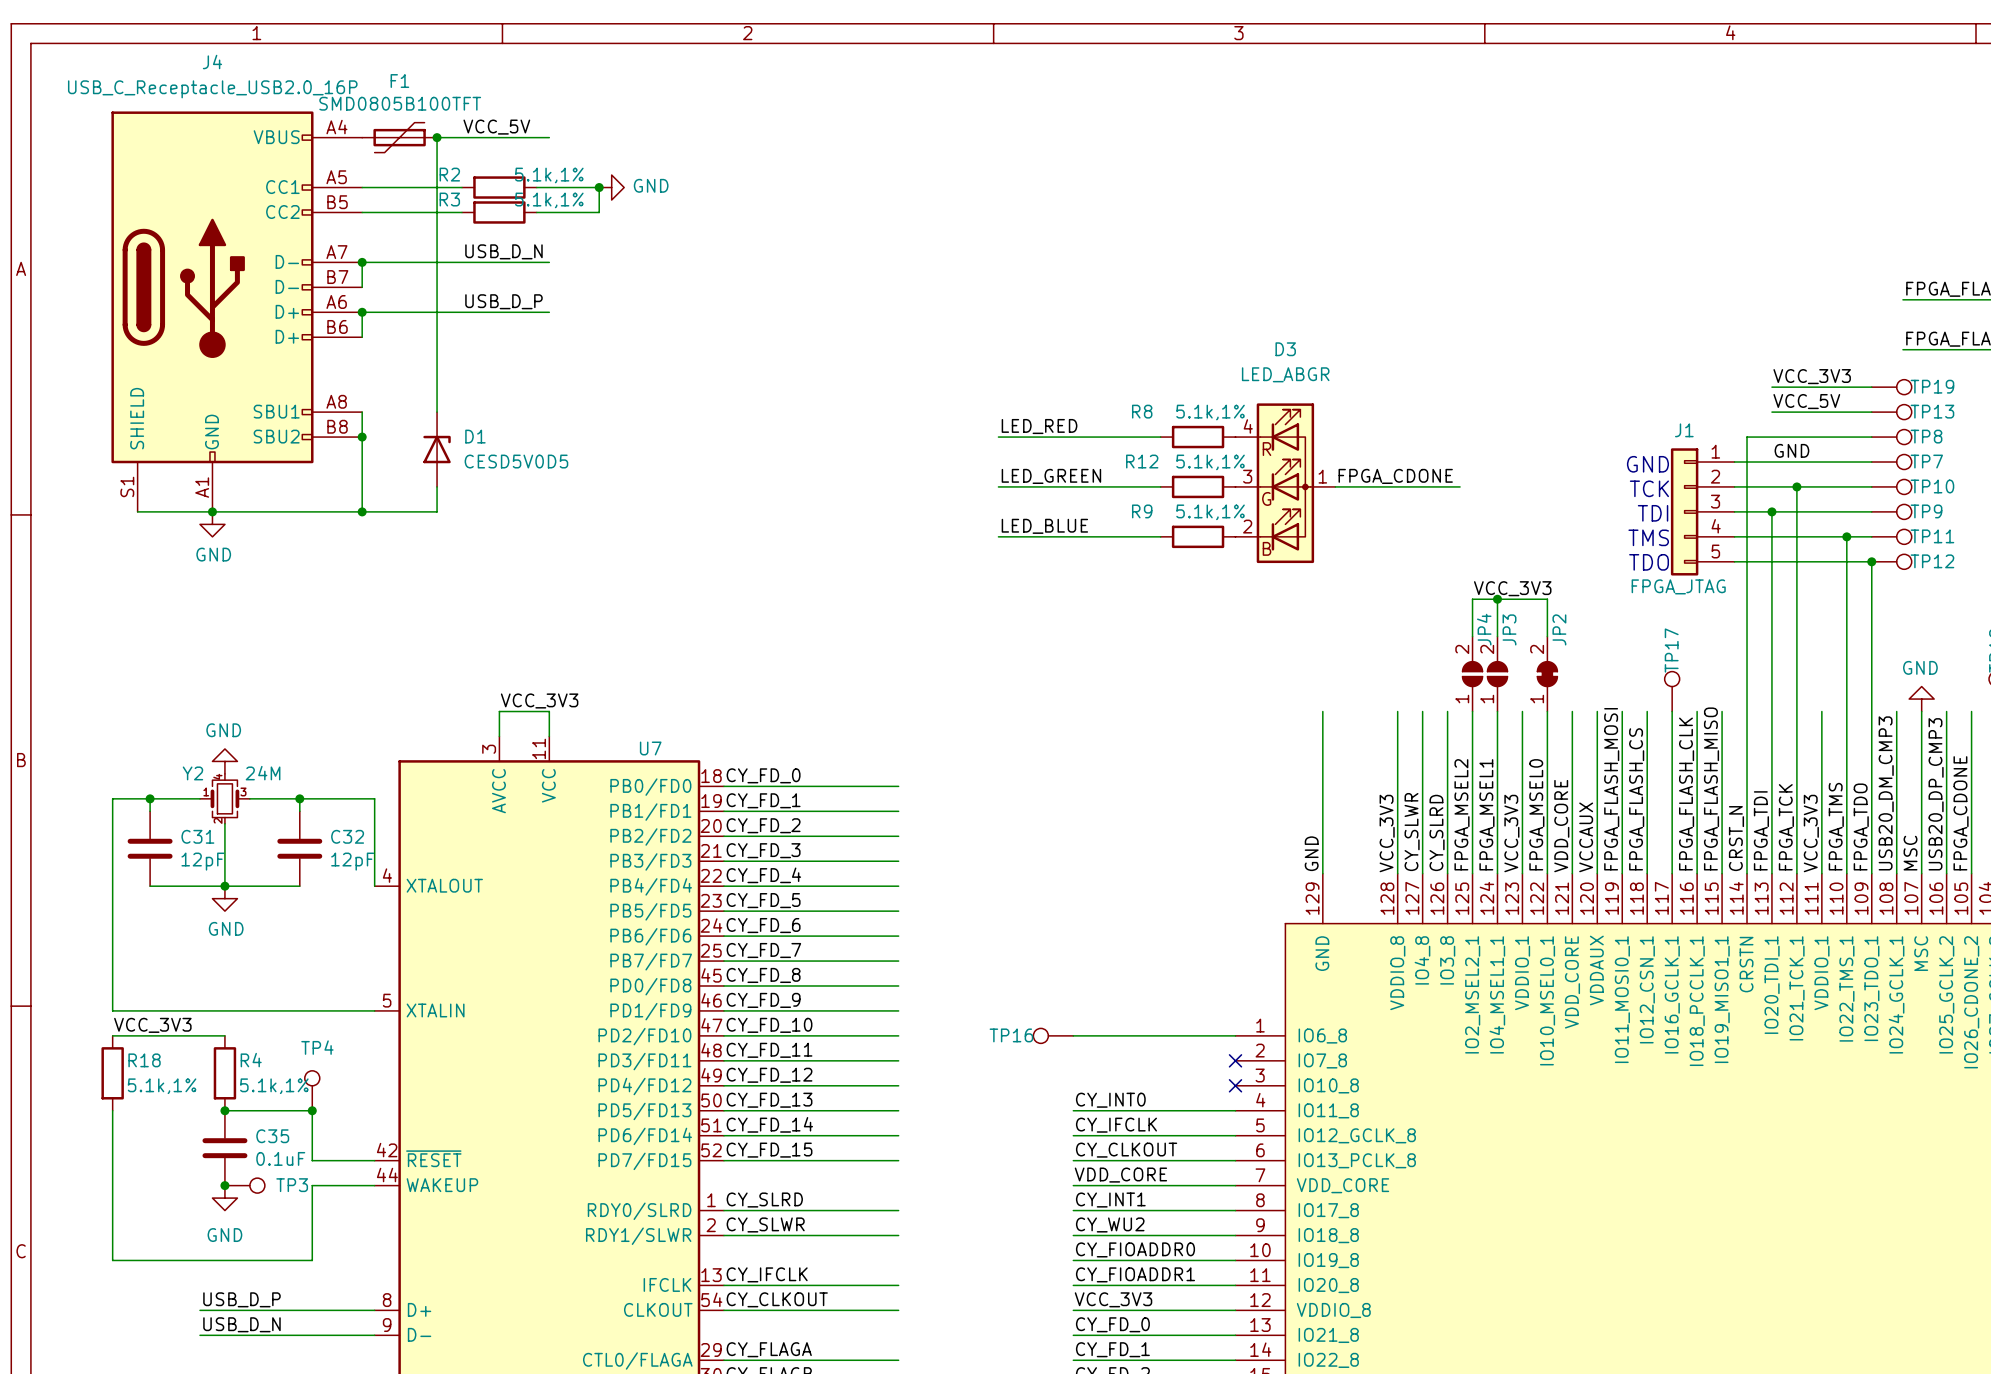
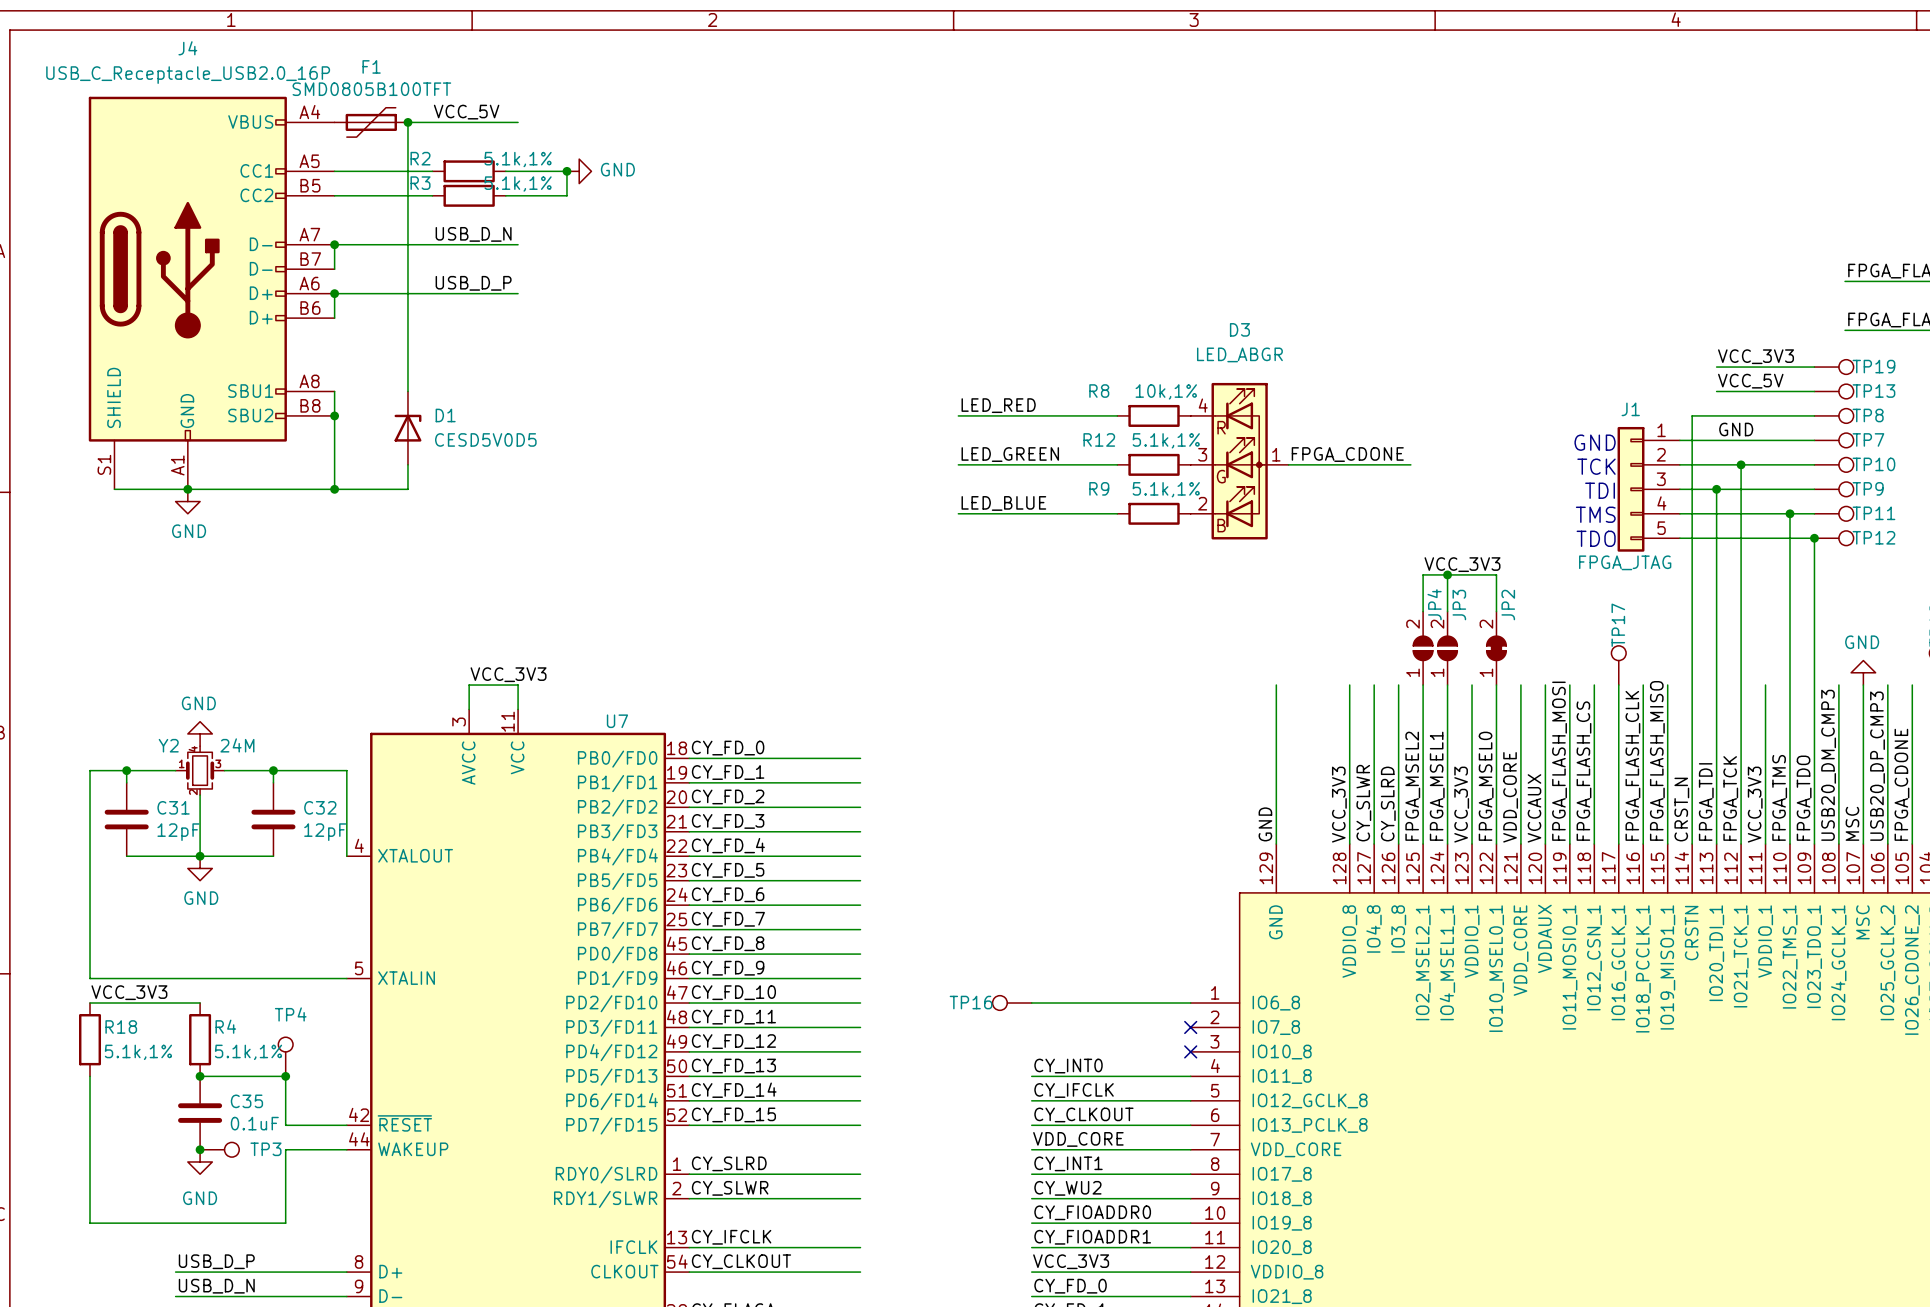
R8 value: 5.1k,1% (1210, 412) -> 10k,1% (1166, 391)

